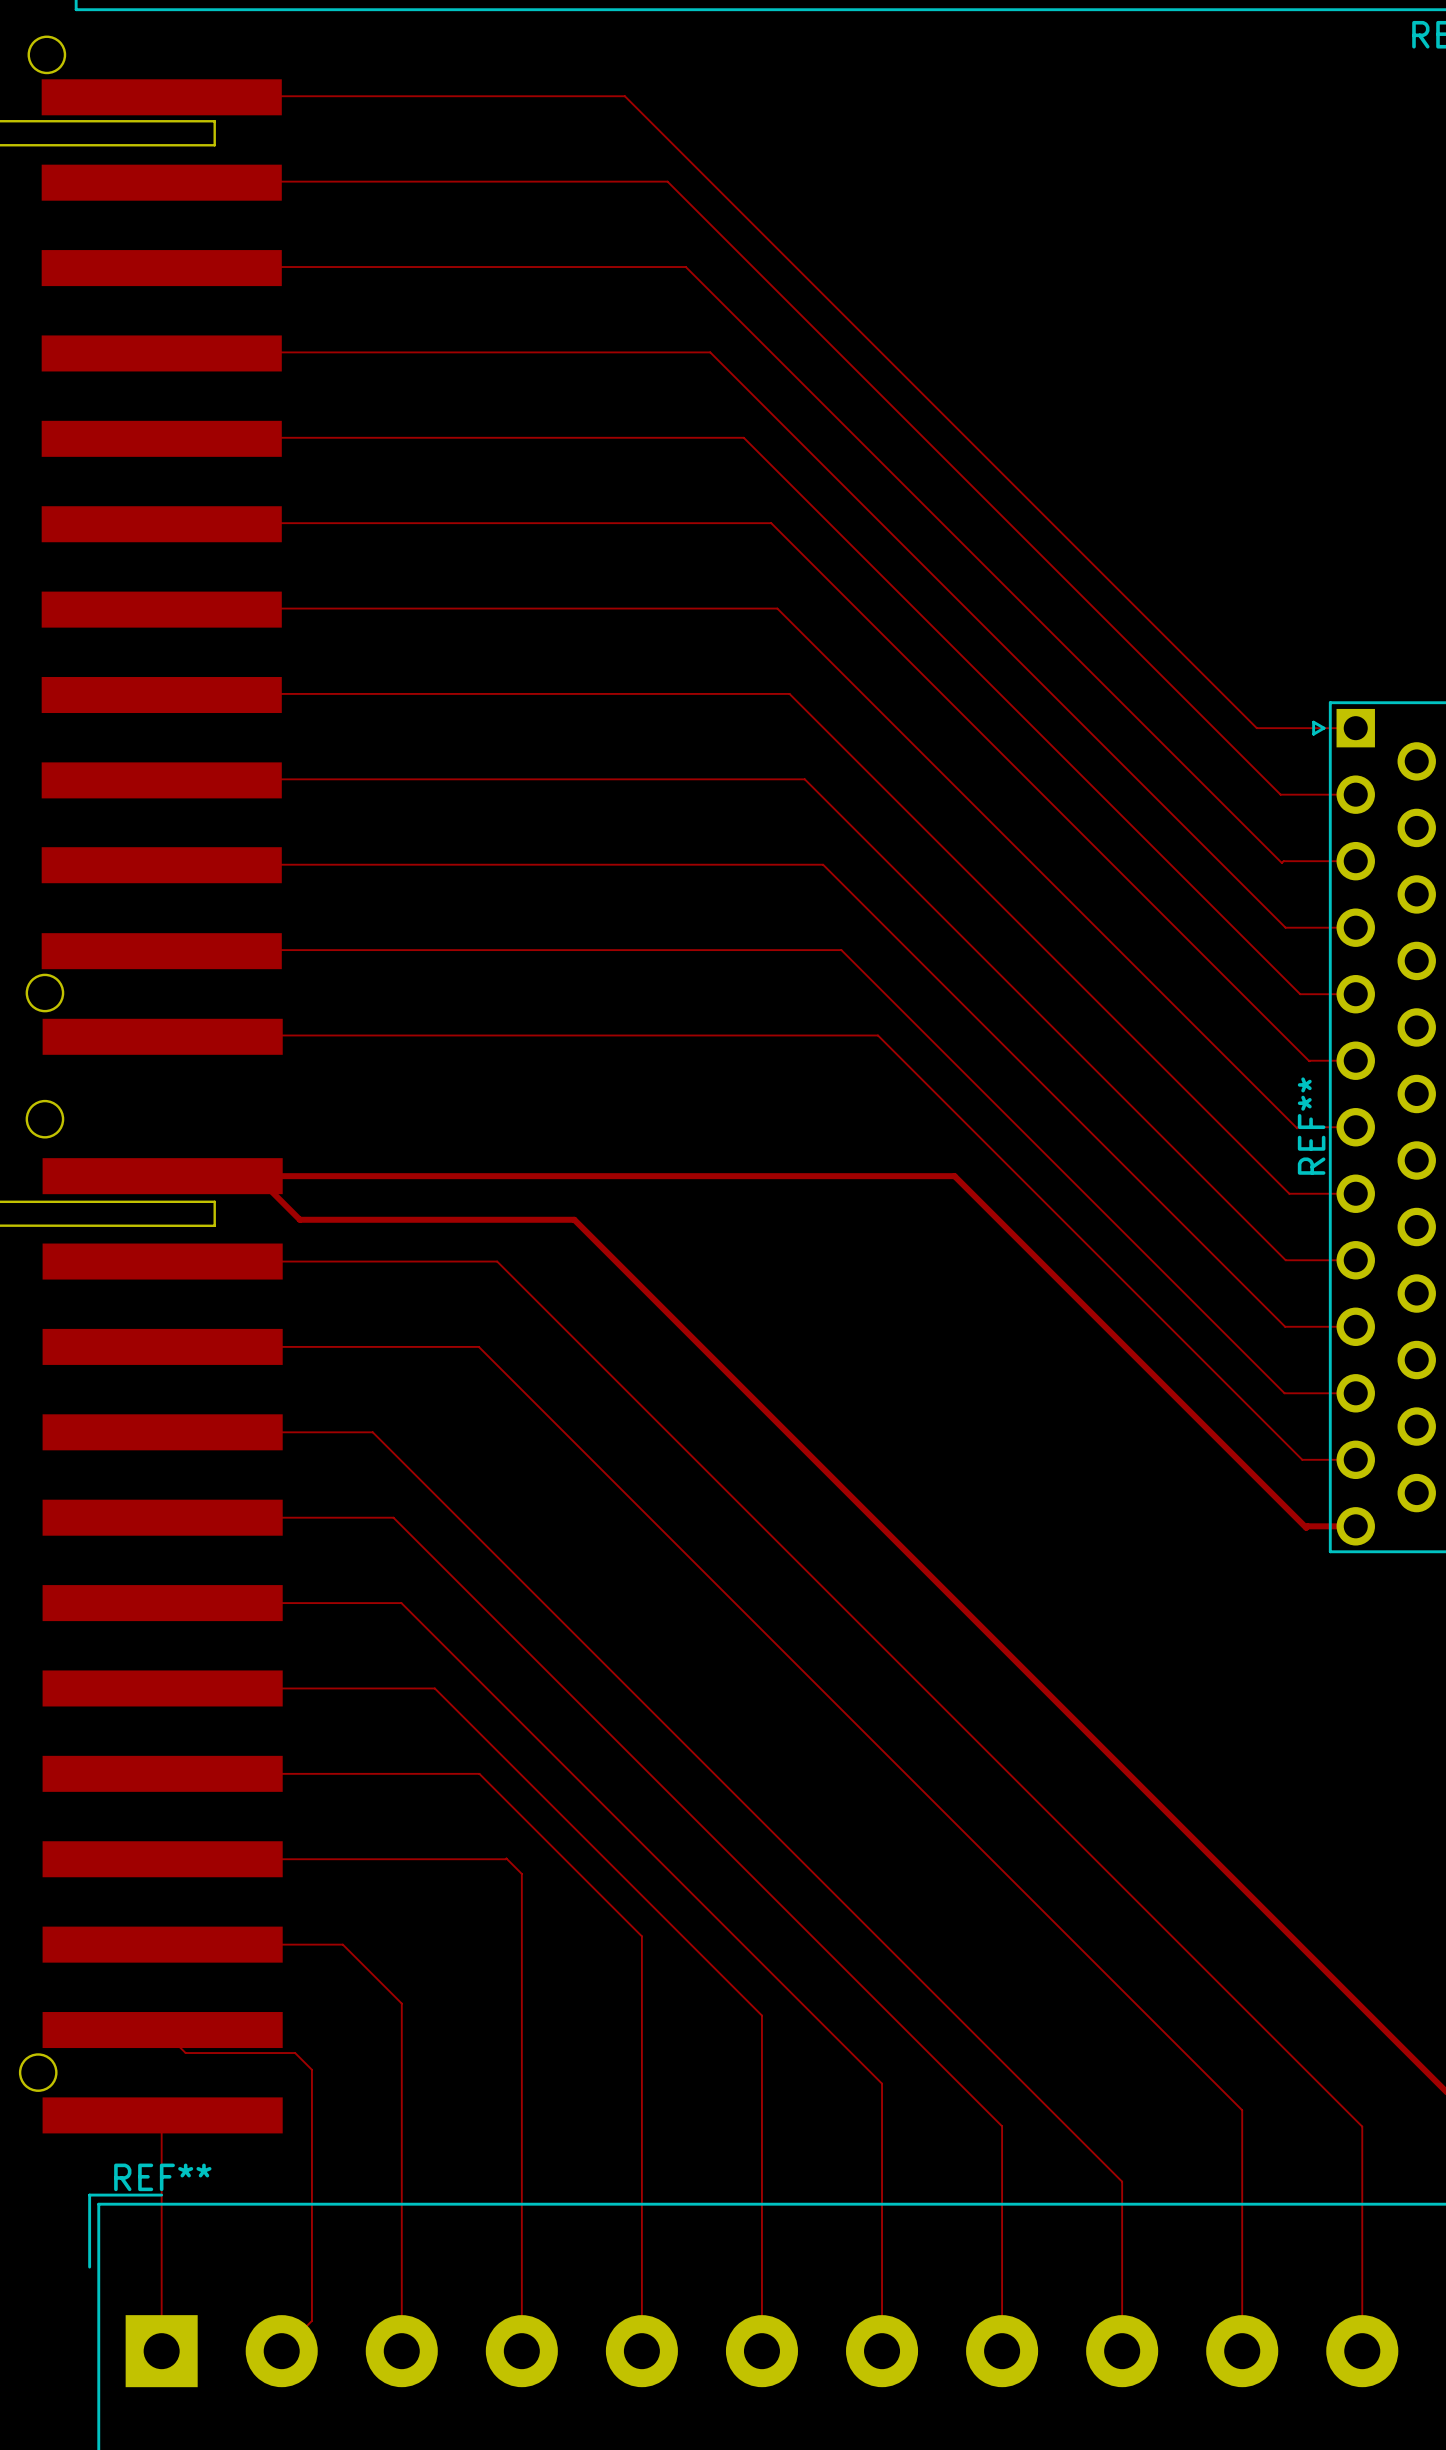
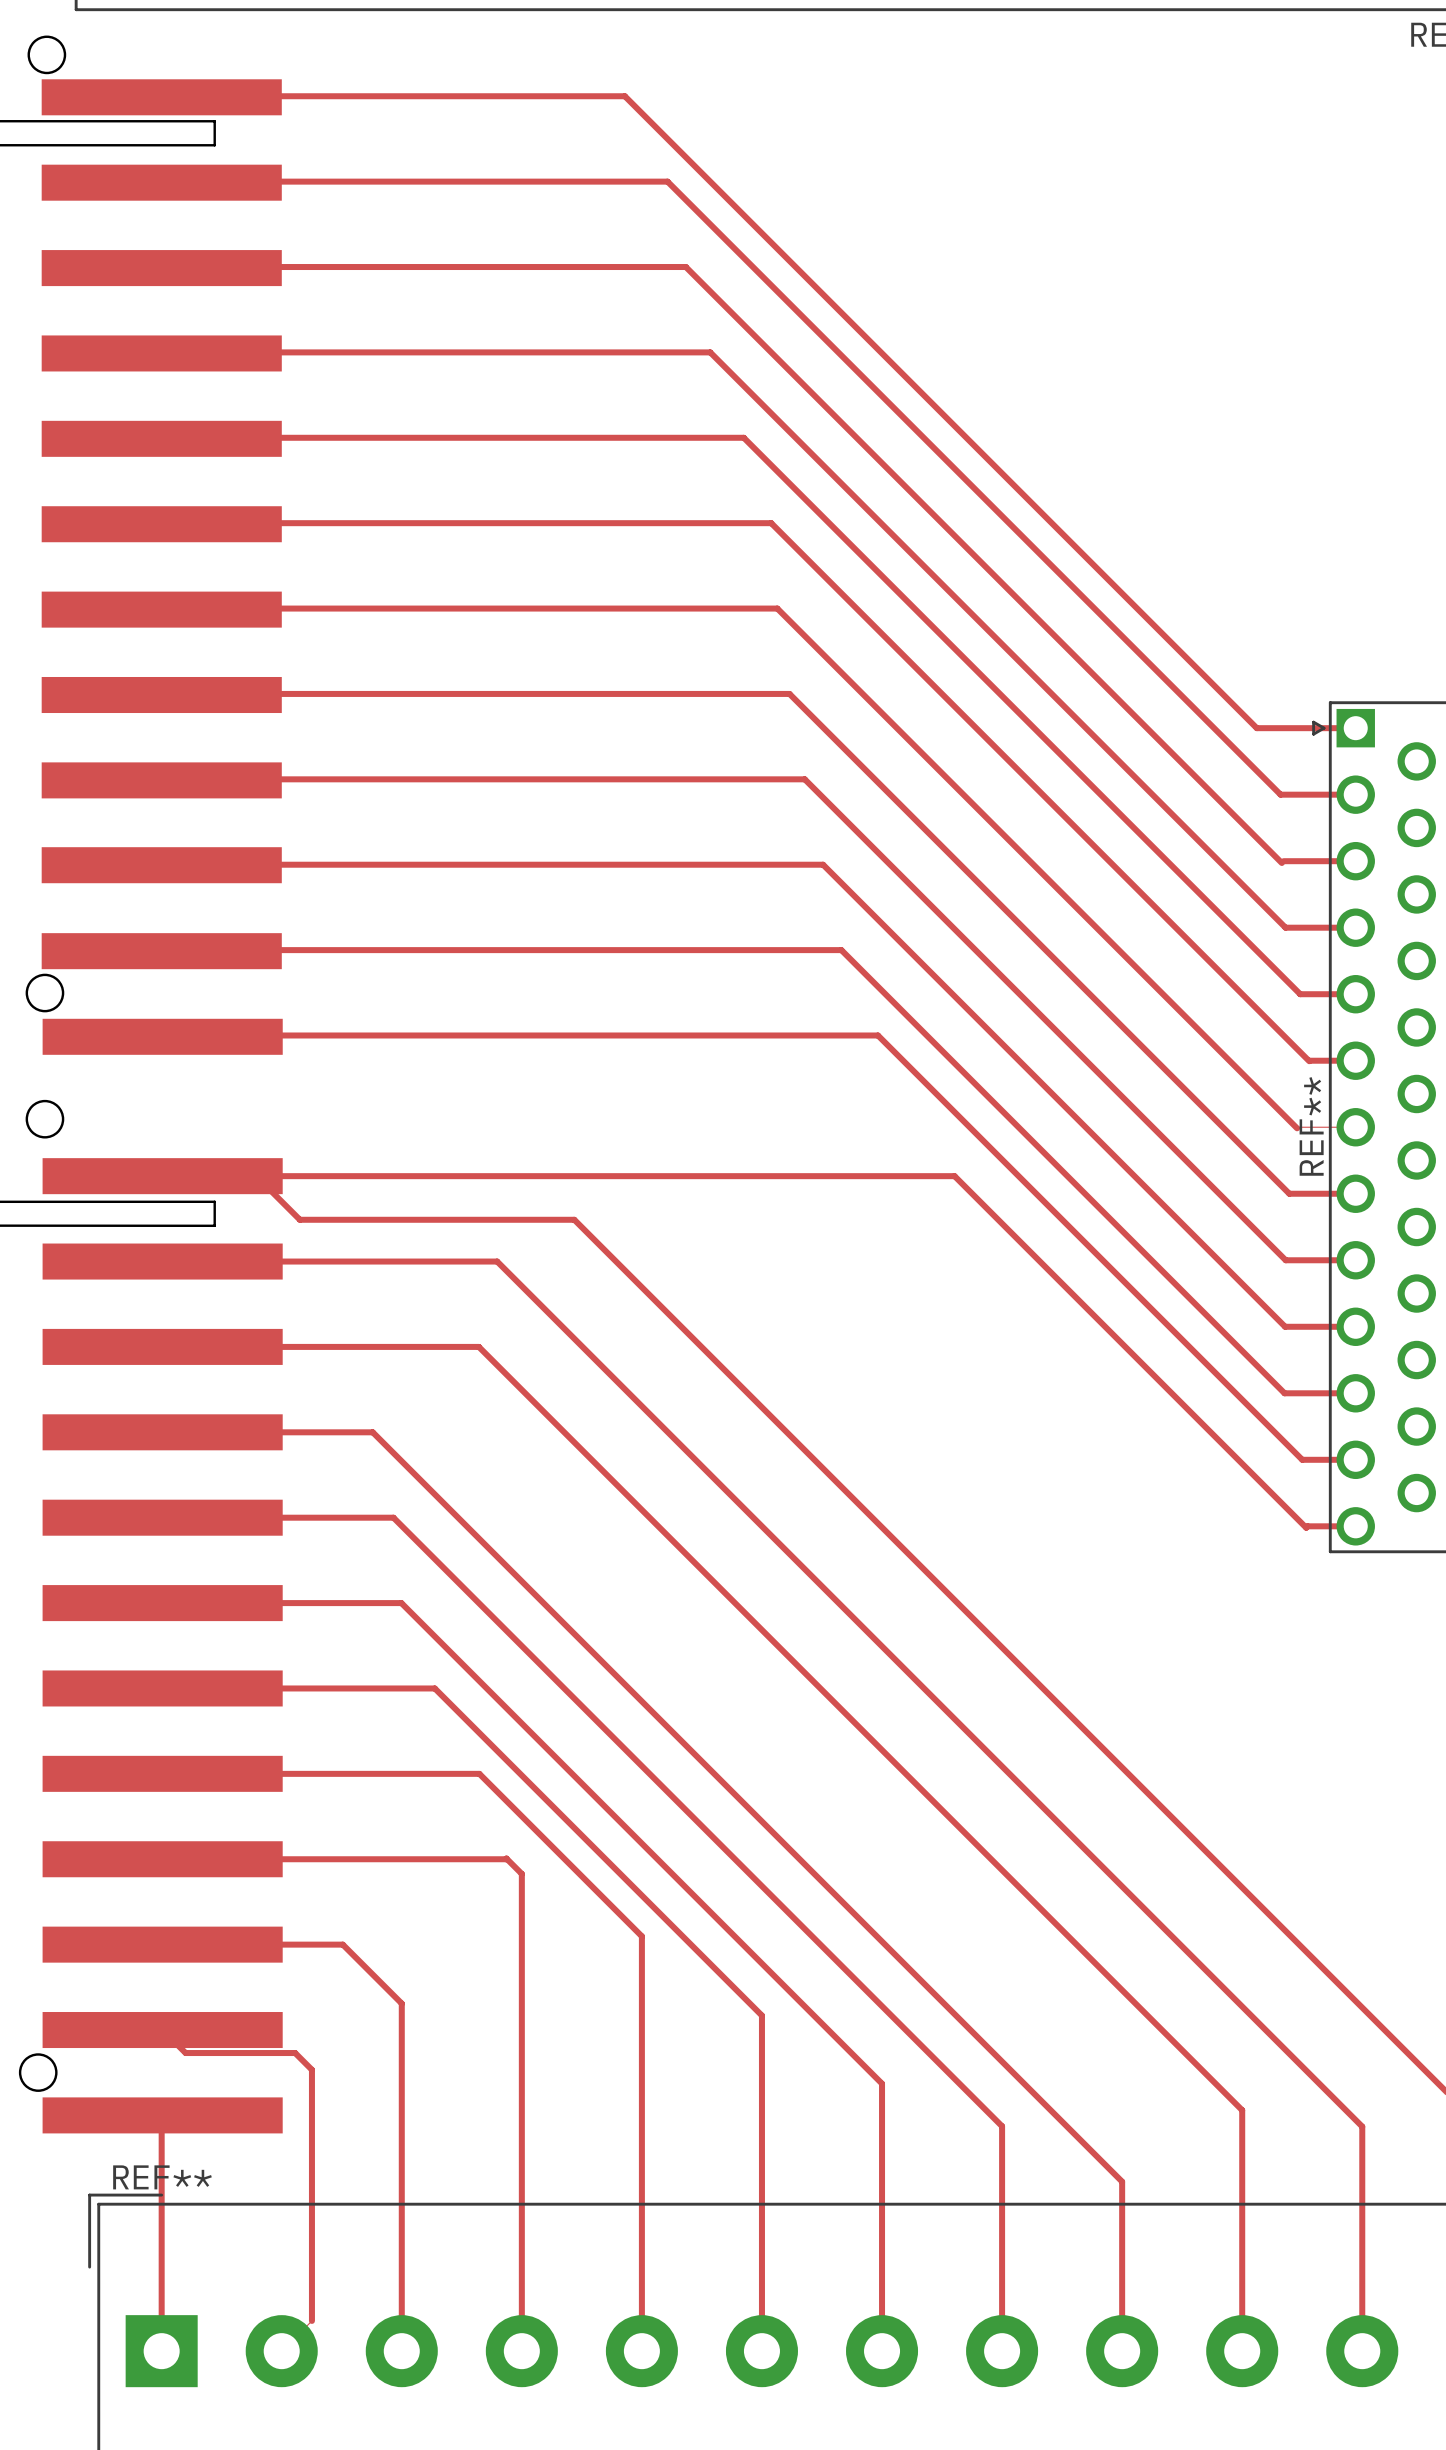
track width: thin (161, 96) (624, 96) (1256, 728) (1355, 728) -> thick (161, 96) (624, 96) (1256, 728) (1355, 728)
track width: thin (161, 181) (667, 181) (1280, 794) (1355, 794) -> thick (161, 181) (667, 181) (1280, 794) (1355, 794)
track width: thin (161, 267) (685, 267) (1281, 862) -> thick (161, 267) (685, 267) (1281, 862)
track width: thin (161, 352) (710, 352) (1285, 927) (1355, 927) -> thick (161, 352) (710, 352) (1285, 927) (1355, 927)
track width: thin (161, 437) (743, 437) (1300, 994) (1355, 994) -> thick (161, 437) (743, 437) (1300, 994) (1355, 994)
track width: thin (161, 523) (771, 523) (1309, 1061) -> thick (161, 523) (771, 523) (1309, 1061)
track width: thin (161, 608) (777, 608) (1297, 1128) -> thick (161, 608) (777, 608) (1297, 1128)
track width: thin (161, 693) (789, 693) (1289, 1193) (1355, 1193) -> thick (161, 693) (789, 693) (1289, 1193) (1355, 1193)
track width: thin (161, 779) (804, 779) (1285, 1260) (1355, 1260) -> thick (161, 779) (804, 779) (1285, 1260) (1355, 1260)
track width: thin (1283, 861) (1355, 861) -> thick (1283, 861) (1355, 861)
track width: thin (161, 864) (823, 864) (1285, 1326) (1355, 1326) -> thick (161, 864) (823, 864) (1285, 1326) (1355, 1326)
track width: thin (161, 950) (841, 950) (1284, 1393) (1355, 1393) -> thick (161, 950) (841, 950) (1284, 1393) (1355, 1393)
track width: thin (161, 1035) (877, 1035) (1302, 1459) (1355, 1459) -> thick (161, 1035) (877, 1035) (1302, 1459) (1355, 1459)
track width: thin (1309, 1060) (1355, 1060) -> thick (1309, 1060) (1355, 1060)
track width: thin (162, 1261) (497, 1261) (1362, 2126) (1362, 2351) -> thick (162, 1261) (497, 1261) (1362, 2126) (1362, 2351)
track width: thin (162, 1346) (478, 1346) (1242, 2110) (1242, 2351) -> thick (162, 1346) (478, 1346) (1242, 2110) (1242, 2351)
track width: thin (162, 1432) (372, 1432) (1122, 2181) (1122, 2351) -> thick (162, 1432) (372, 1432) (1122, 2181) (1122, 2351)
track width: thin (162, 1517) (393, 1517) (1002, 2126) (1002, 2351) -> thick (162, 1517) (393, 1517) (1002, 2126) (1002, 2351)
track width: thin (162, 1603) (401, 1603) (882, 2083) (882, 2351) -> thick (162, 1603) (401, 1603) (882, 2083) (882, 2351)
track width: thin (162, 1688) (434, 1688) (761, 2015) (761, 2351) -> thick (162, 1688) (434, 1688) (761, 2015) (761, 2351)
track width: thin (162, 1773) (479, 1773) (641, 1936) (641, 2351) -> thick (162, 1773) (479, 1773) (641, 1936) (641, 2351)
track width: thin (162, 1859) (506, 1858) (521, 1873) (521, 2351) -> thick (162, 1859) (506, 1858) (521, 1873) (521, 2351)
track width: thin (162, 1944) (342, 1944) (401, 2003) (401, 2351) -> thick (162, 1944) (342, 1944) (401, 2003) (401, 2351)
track width: thin (162, 2030) (185, 2053) (295, 2053) (311, 2069) (311, 2320) -> thick (162, 2030) (185, 2053) (295, 2053) (311, 2069) (311, 2320)
track width: thin (161, 2116) (161, 2351) -> thick (161, 2116) (161, 2351)

